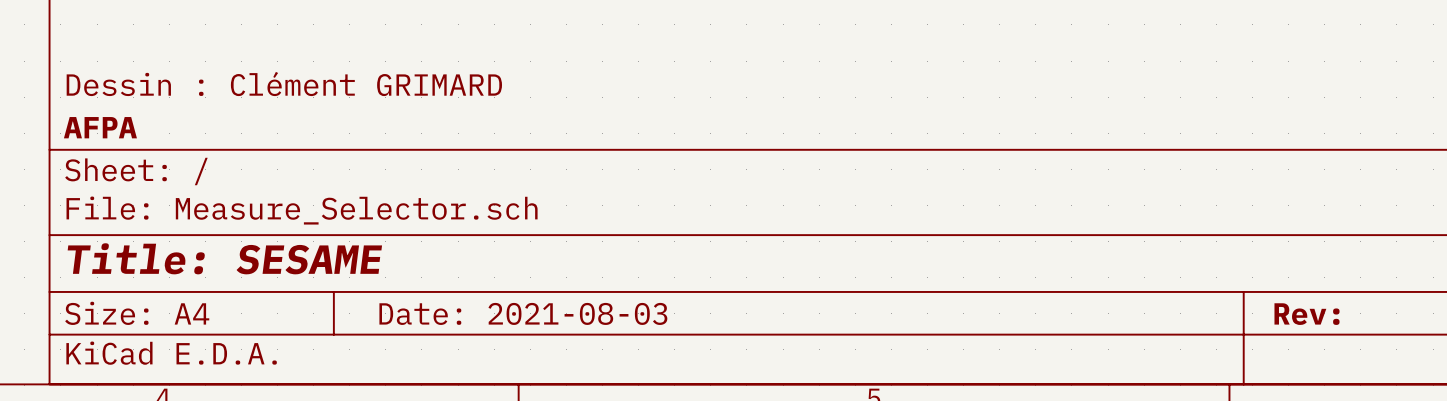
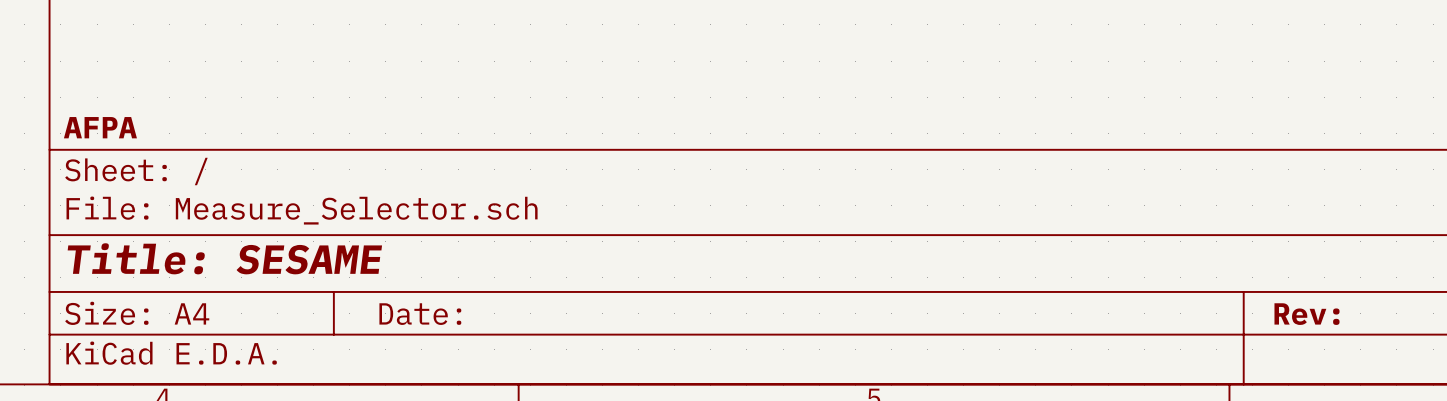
title block: Dessin : Clément GRIMARD (284, 83) -> none
title block: Date: 2021-08-03 (523, 313) -> Date: (420, 314)

